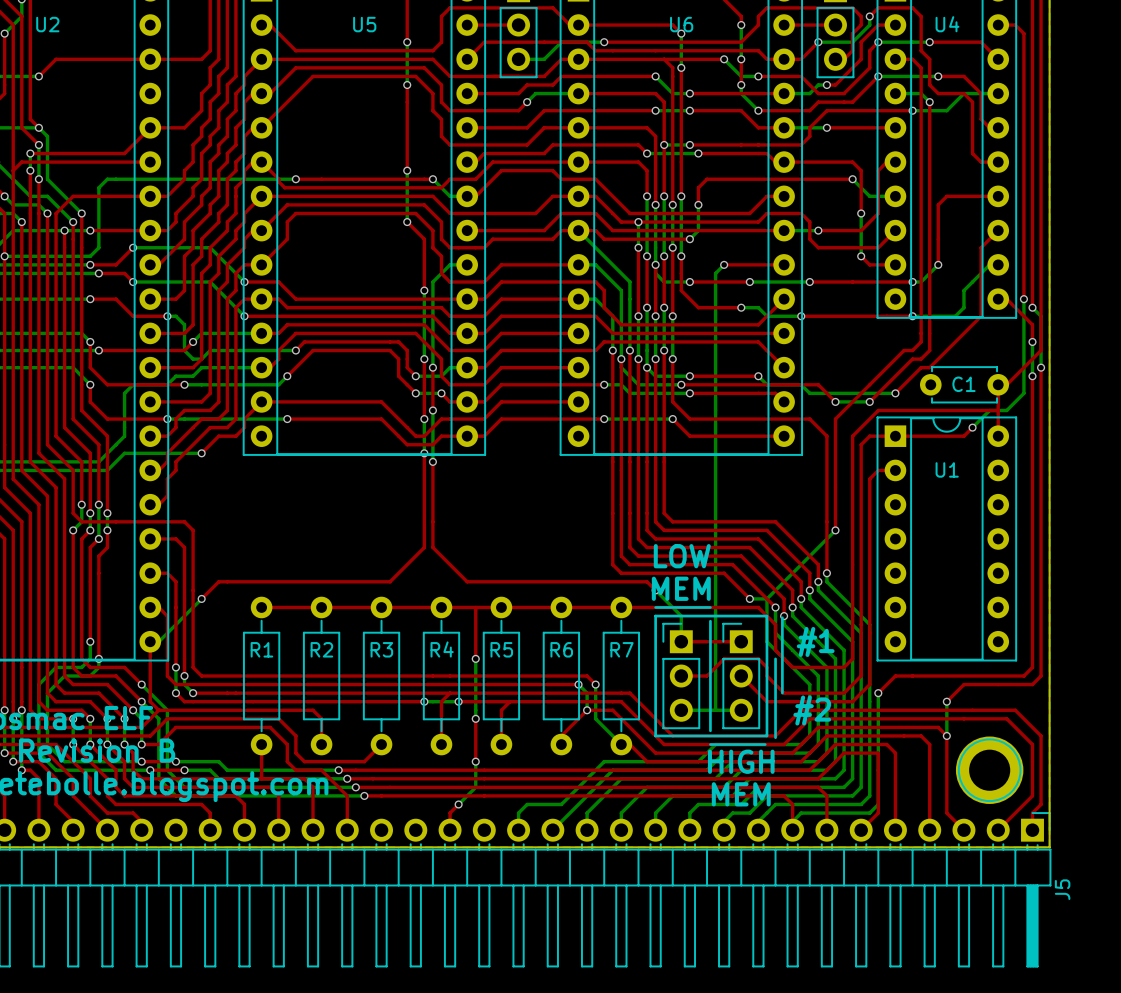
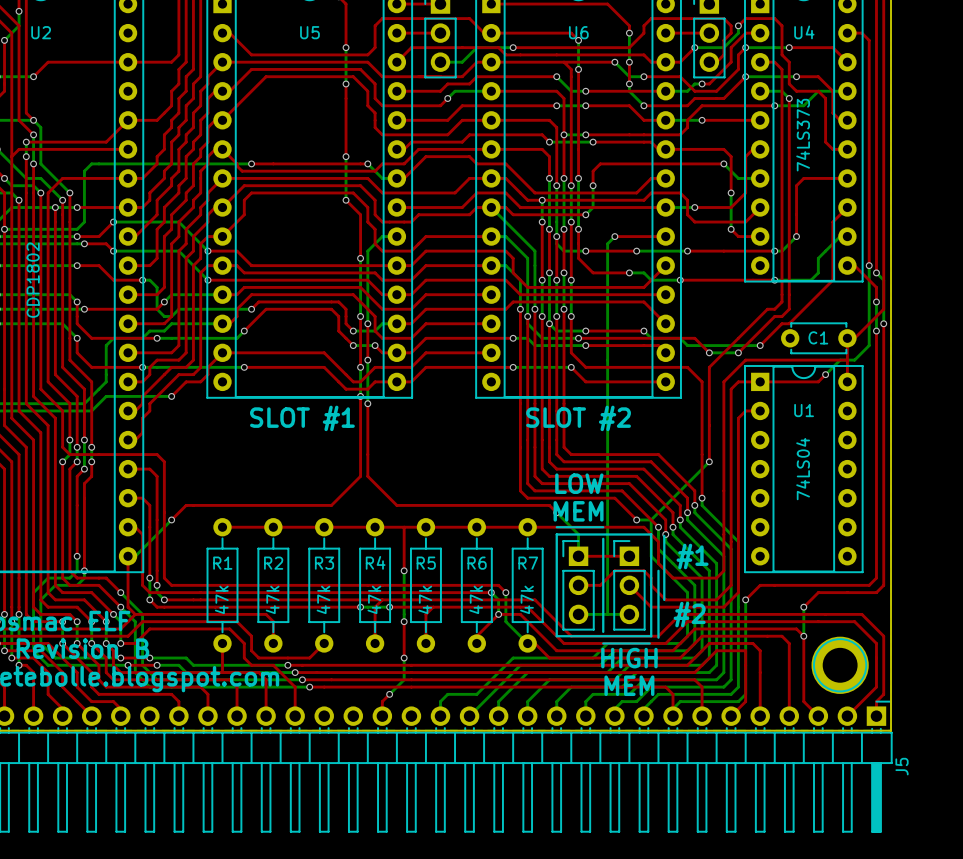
U4 value: none -> 74LS373 (803, 135)
U2 value: none -> CDP1802 (33, 280)
text: none -> SLOT #1 (302, 418)
text: none -> SLOT #2 (578, 418)
U1 value: none -> 74LS04 (803, 469)
R1 value: none -> 47k (221, 599)
R2 value: none -> 47k (272, 599)
R3 value: none -> 47k (323, 599)
R4 value: none -> 47k (374, 599)
R5 value: none -> 47k (425, 599)
R6 value: none -> 47k (476, 599)
R7 value: none -> 47k (526, 599)

